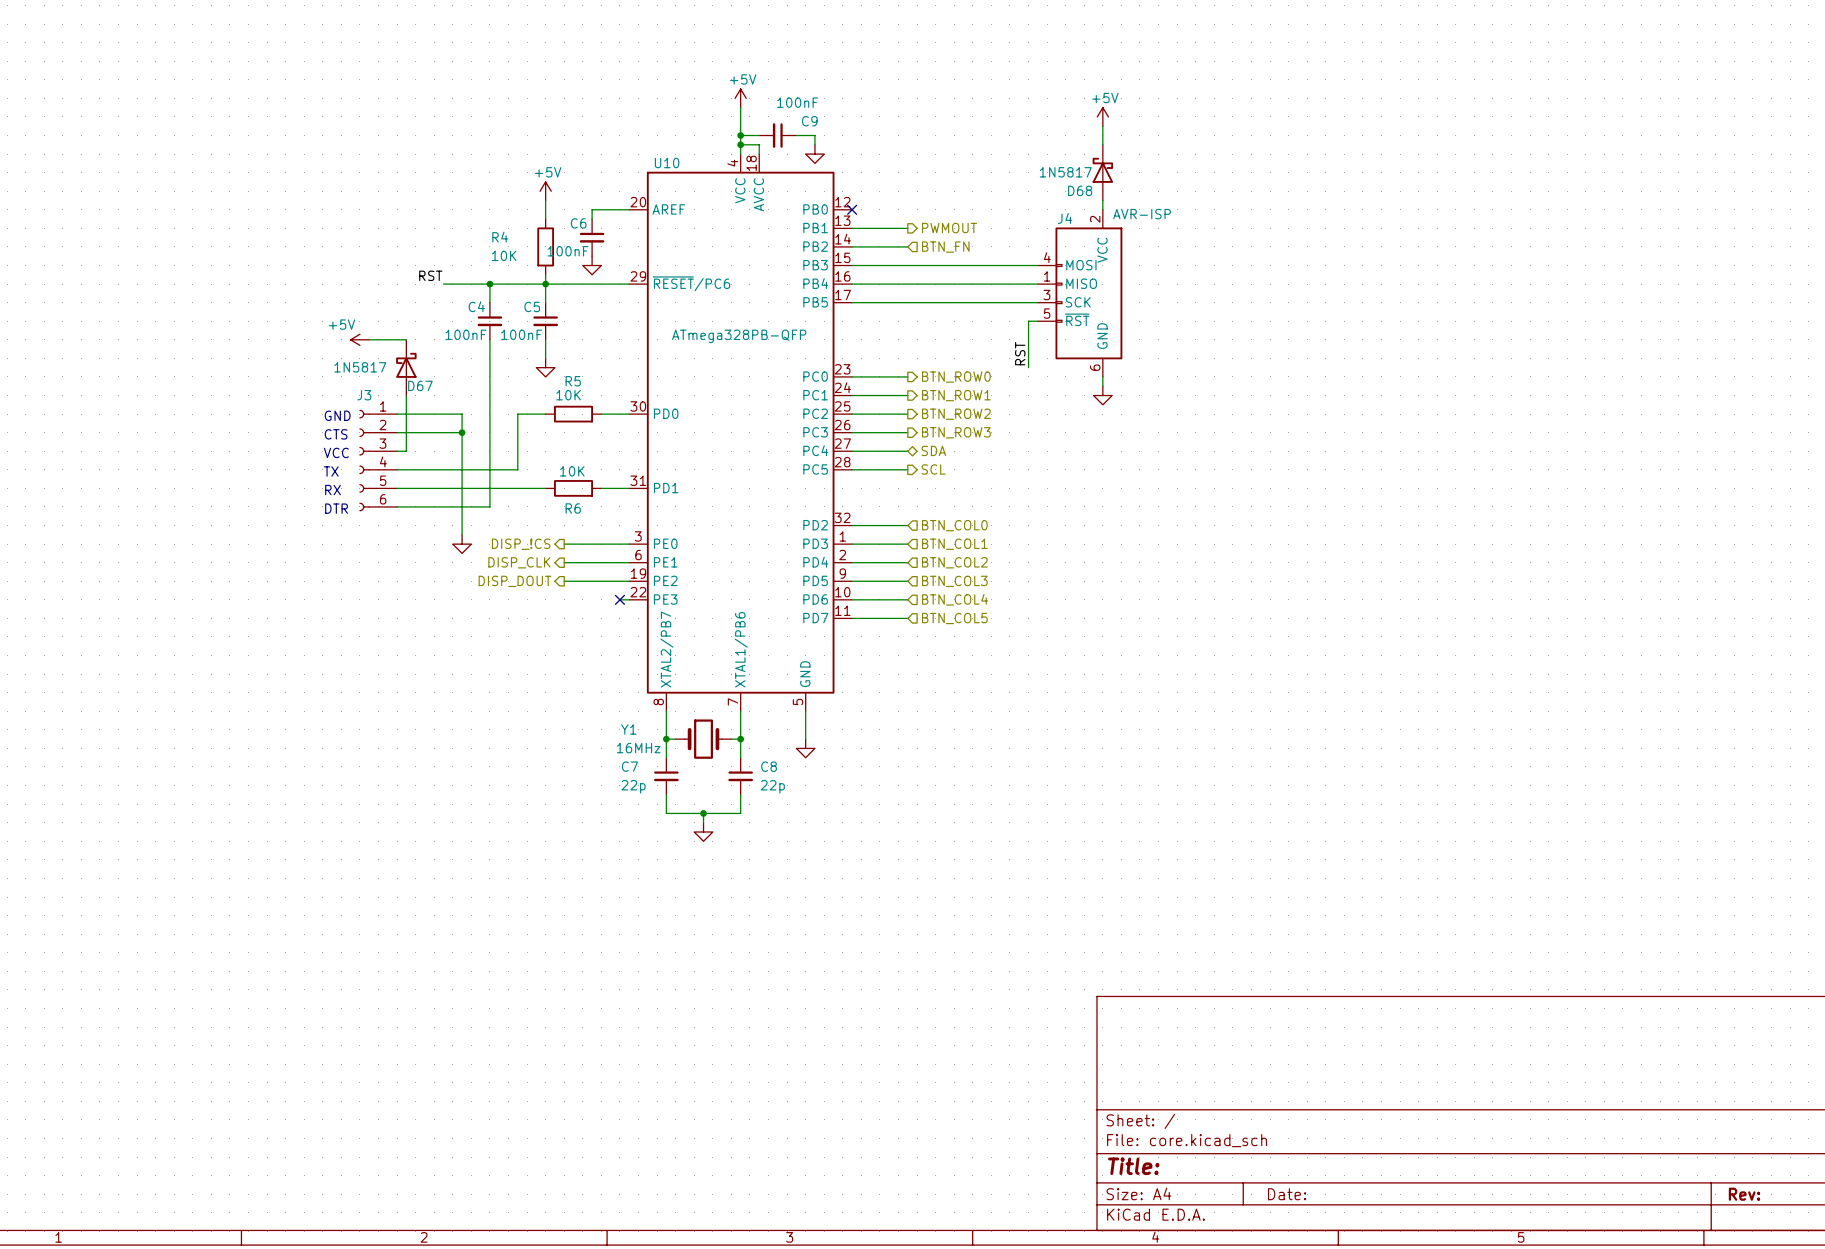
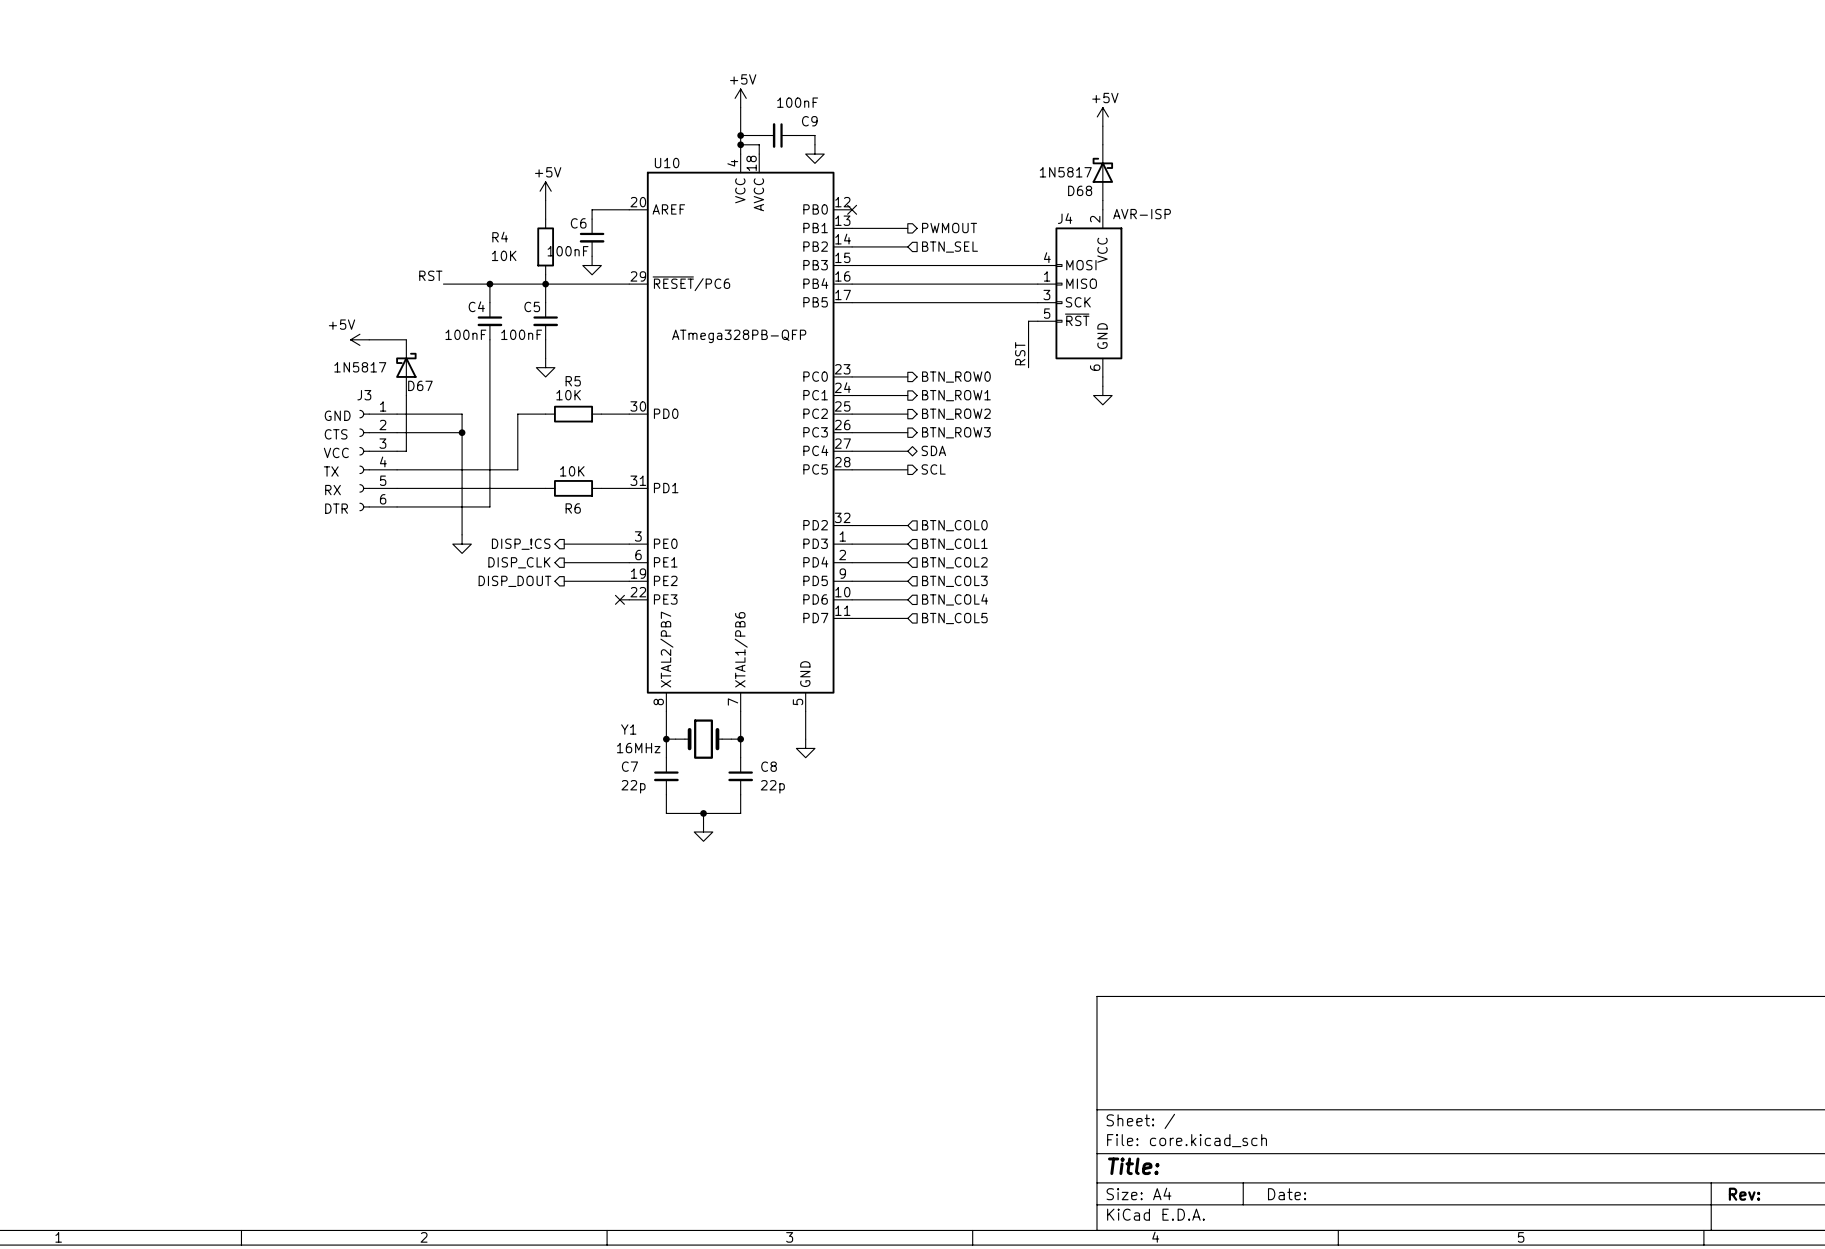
hierarchical label: BTN_FN (945, 247) -> BTN_SEL (949, 247)

